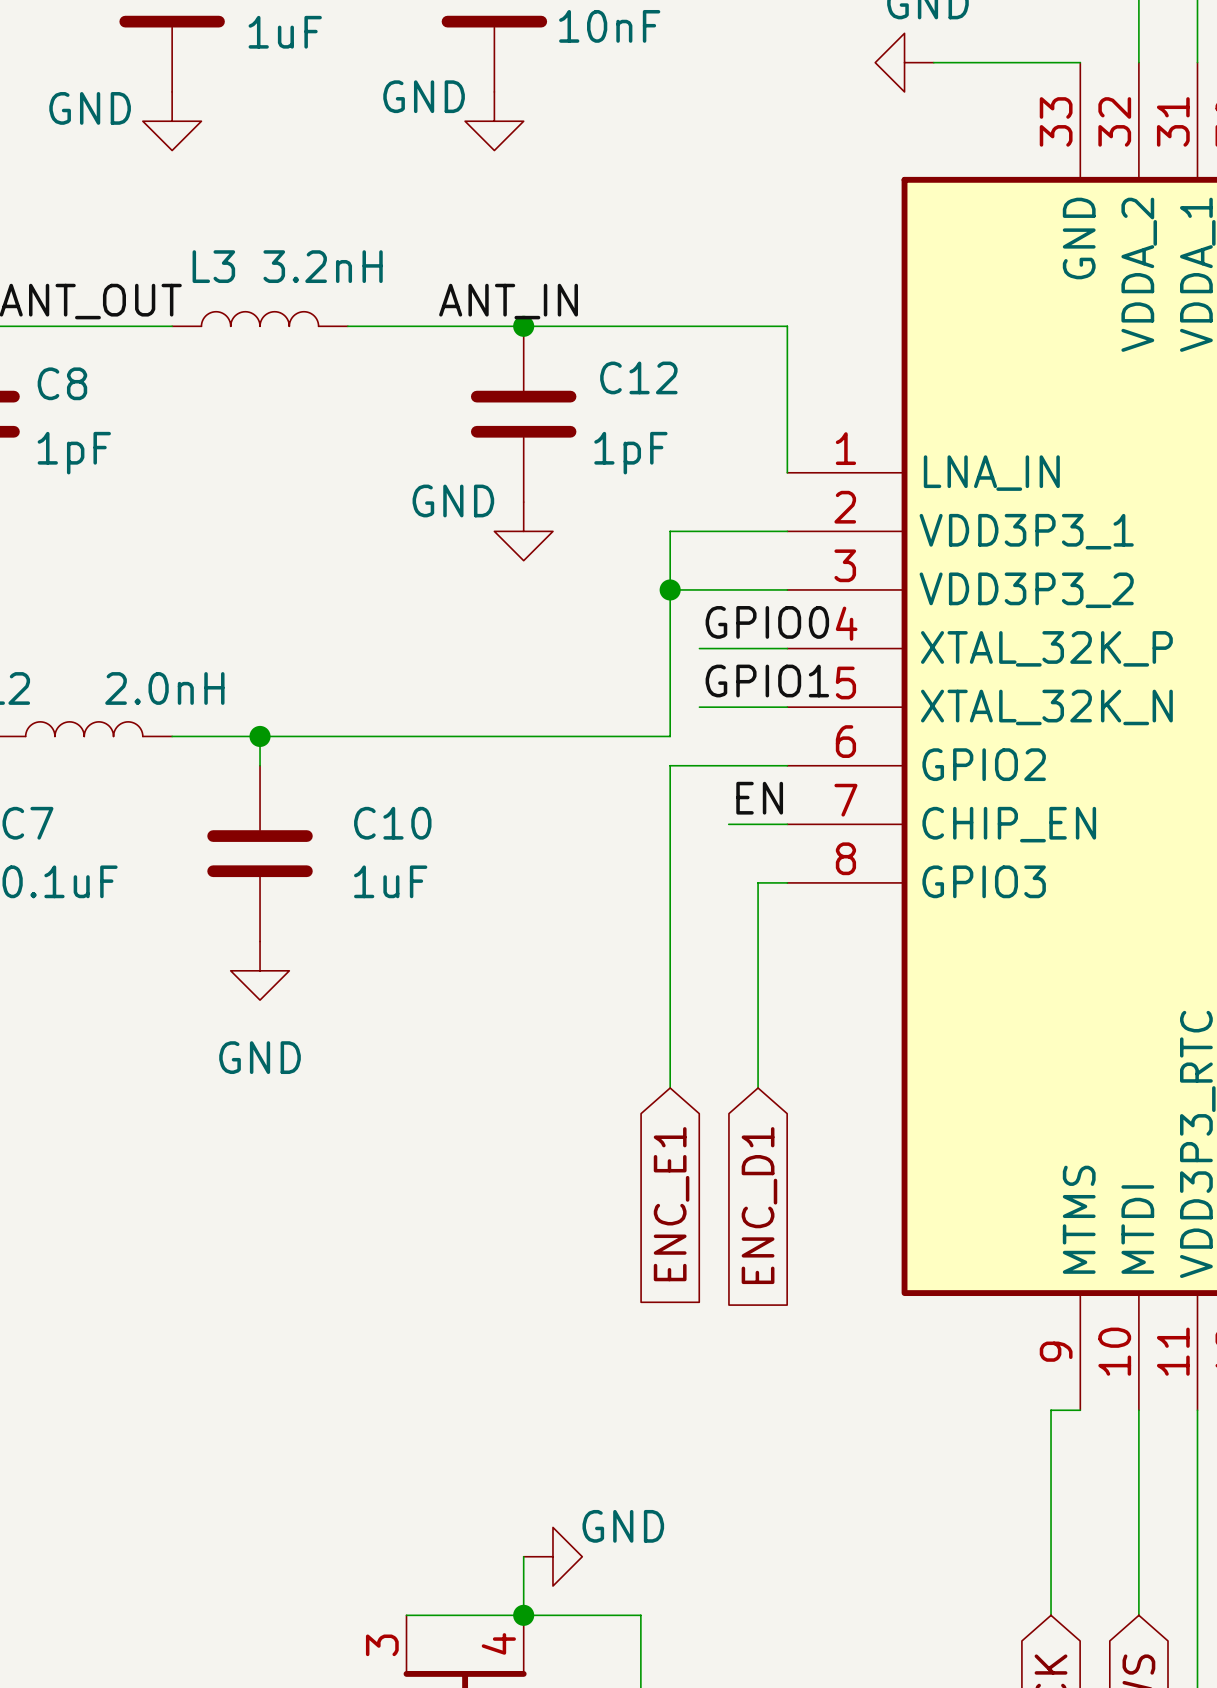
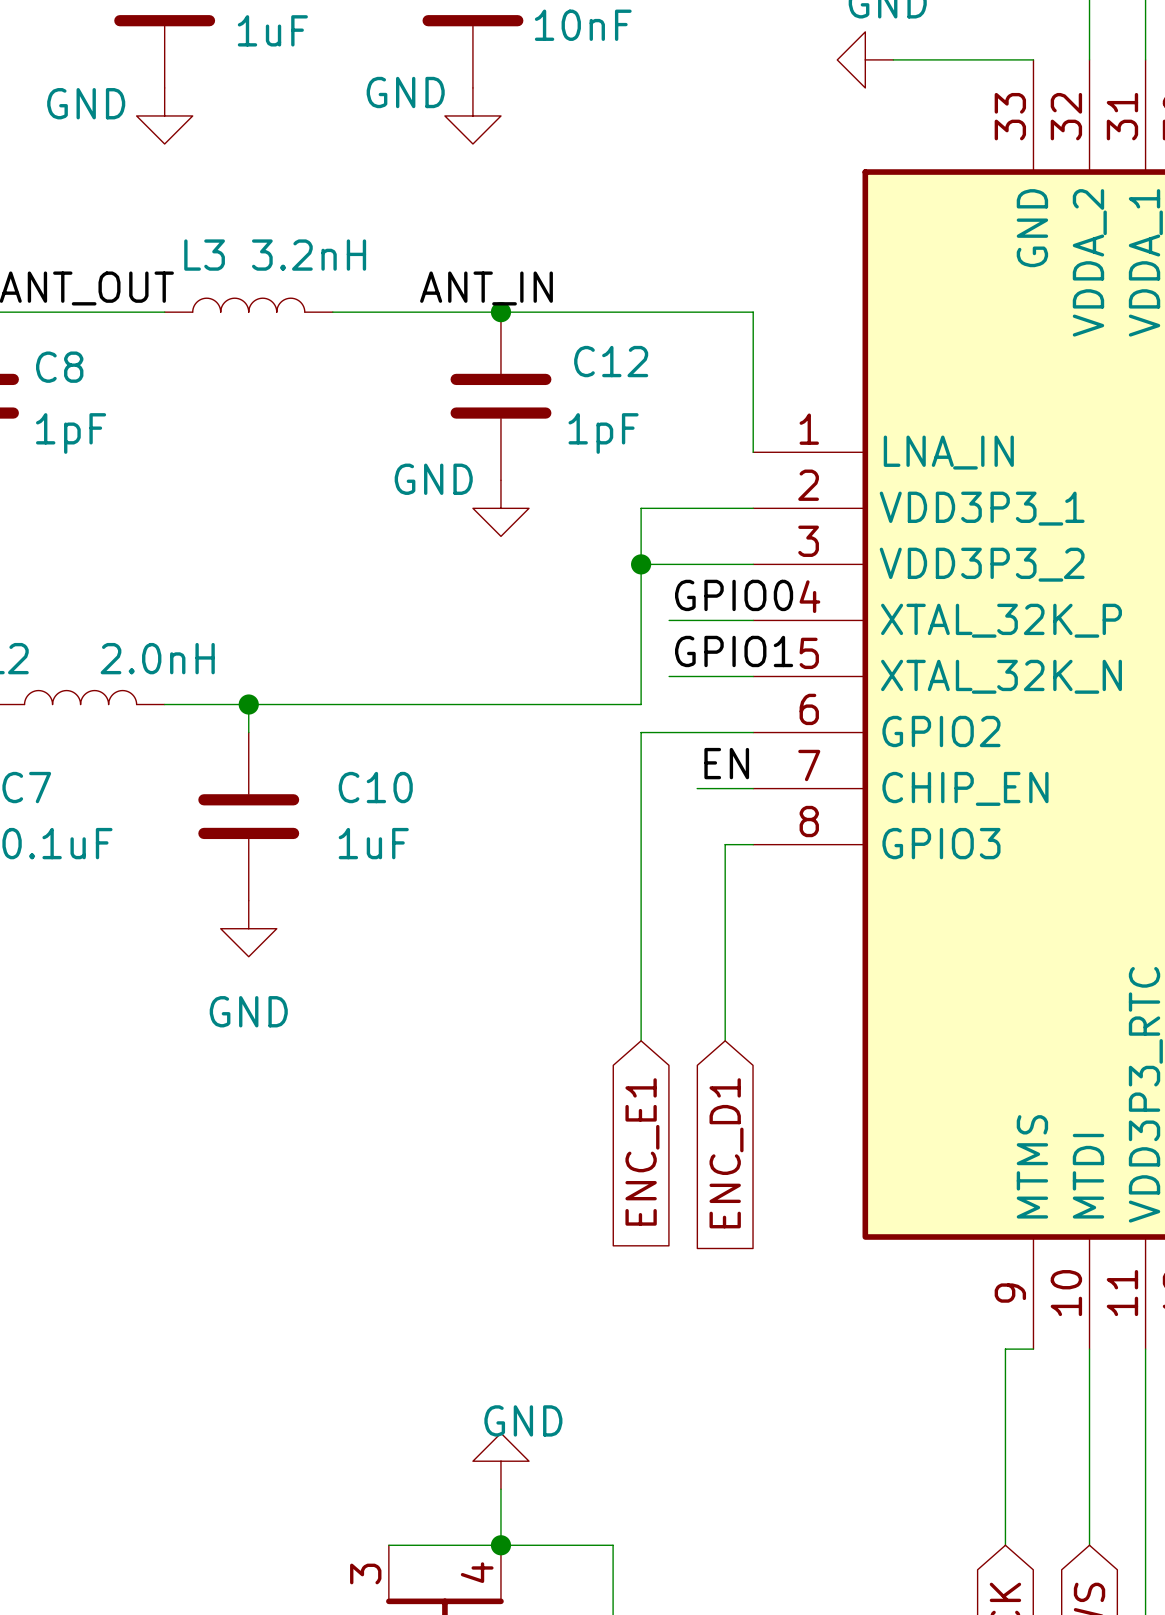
power symbol text position: GND (623, 1526) -> GND (523, 1420)
power symbol rotation: 0° (552, 1556) -> 90° counterclockwise (500, 1461)
power symbol position: GND (552, 1556) -> GND (500, 1461)

